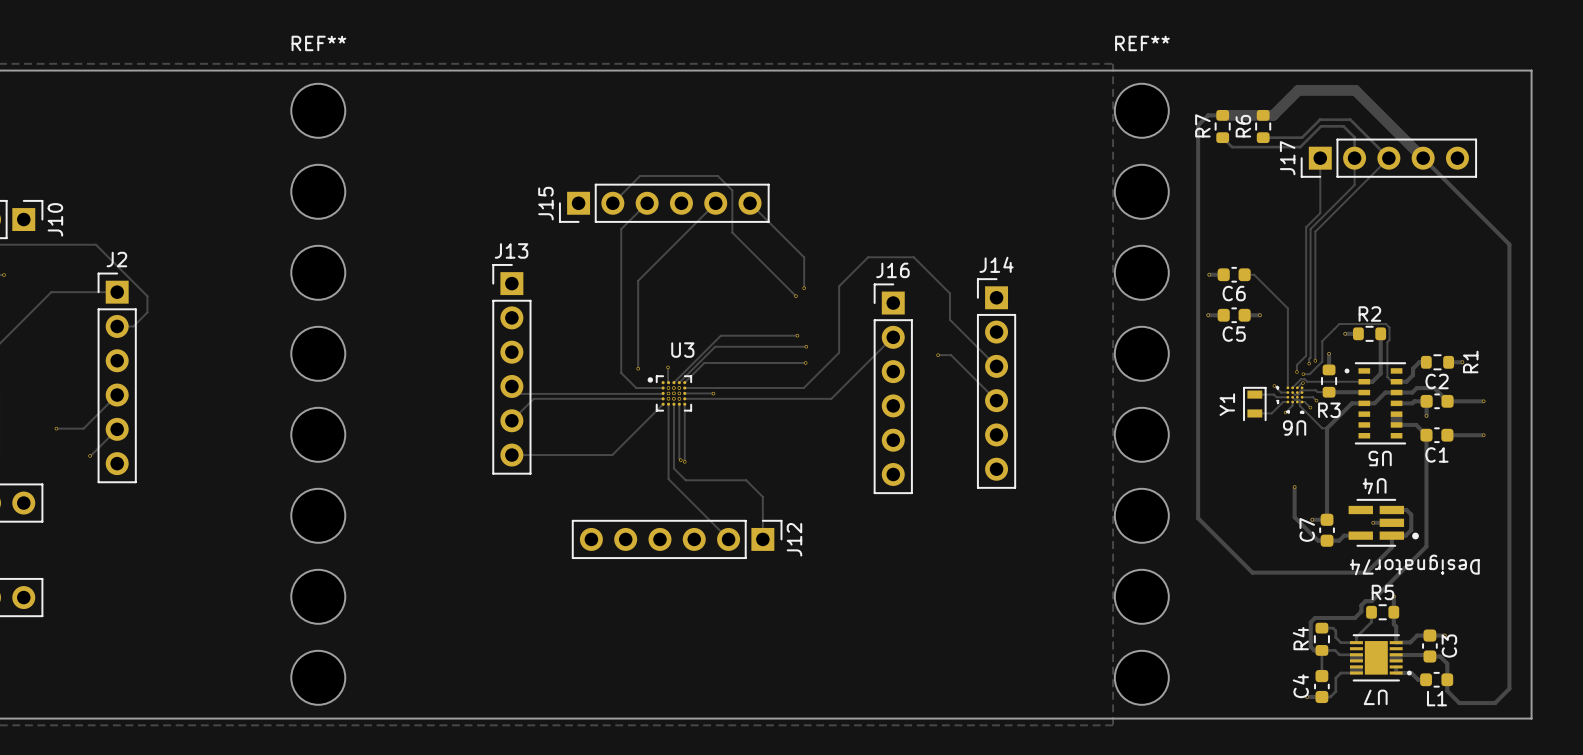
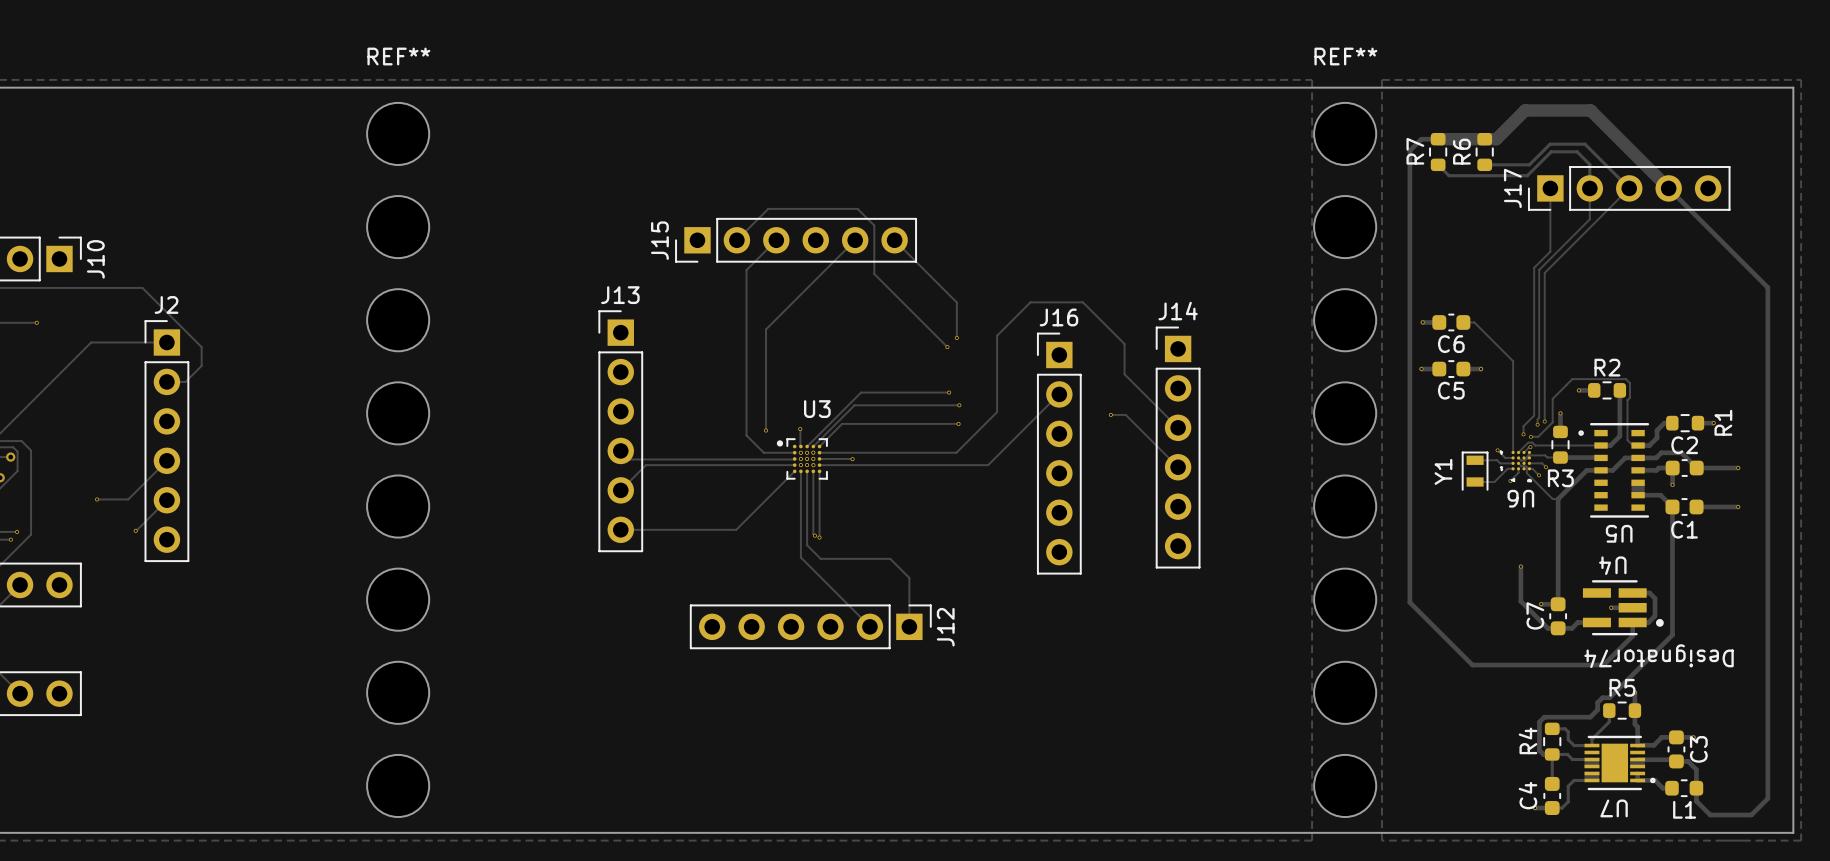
zone outline: none -> (1381, 79) (1801, 79) (1801, 840) (1381, 840) (1381, 79)

